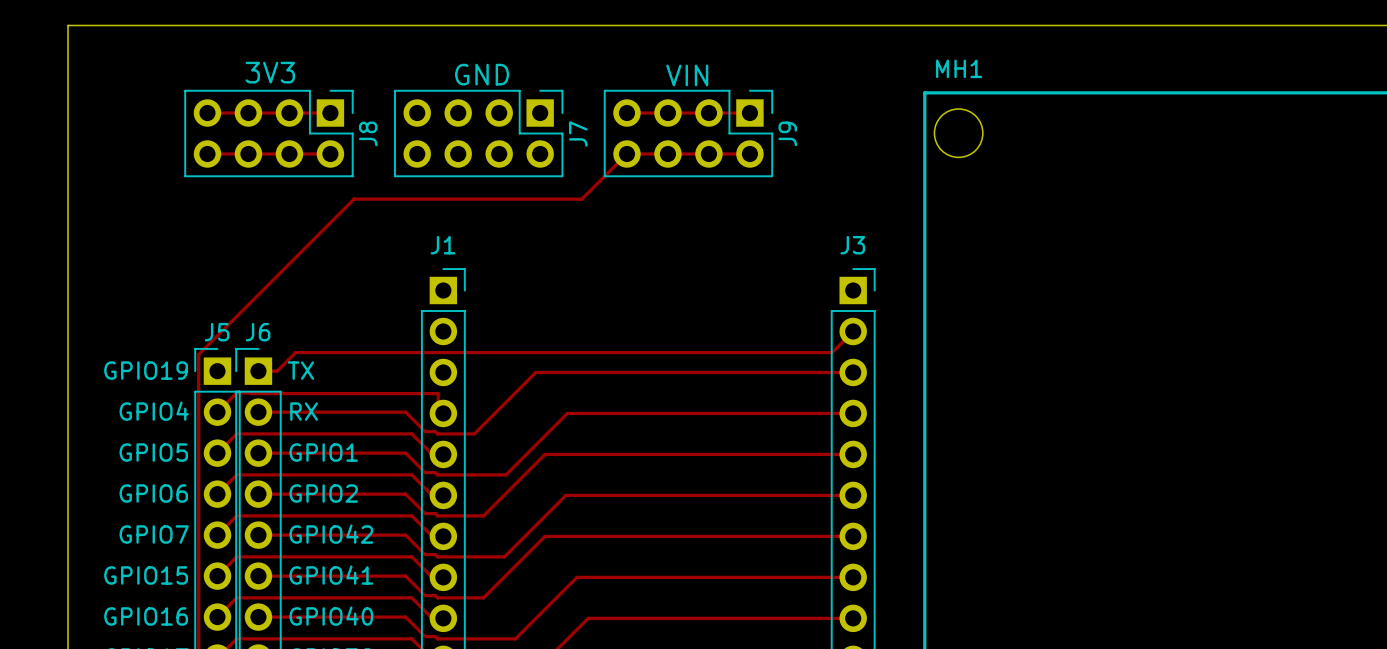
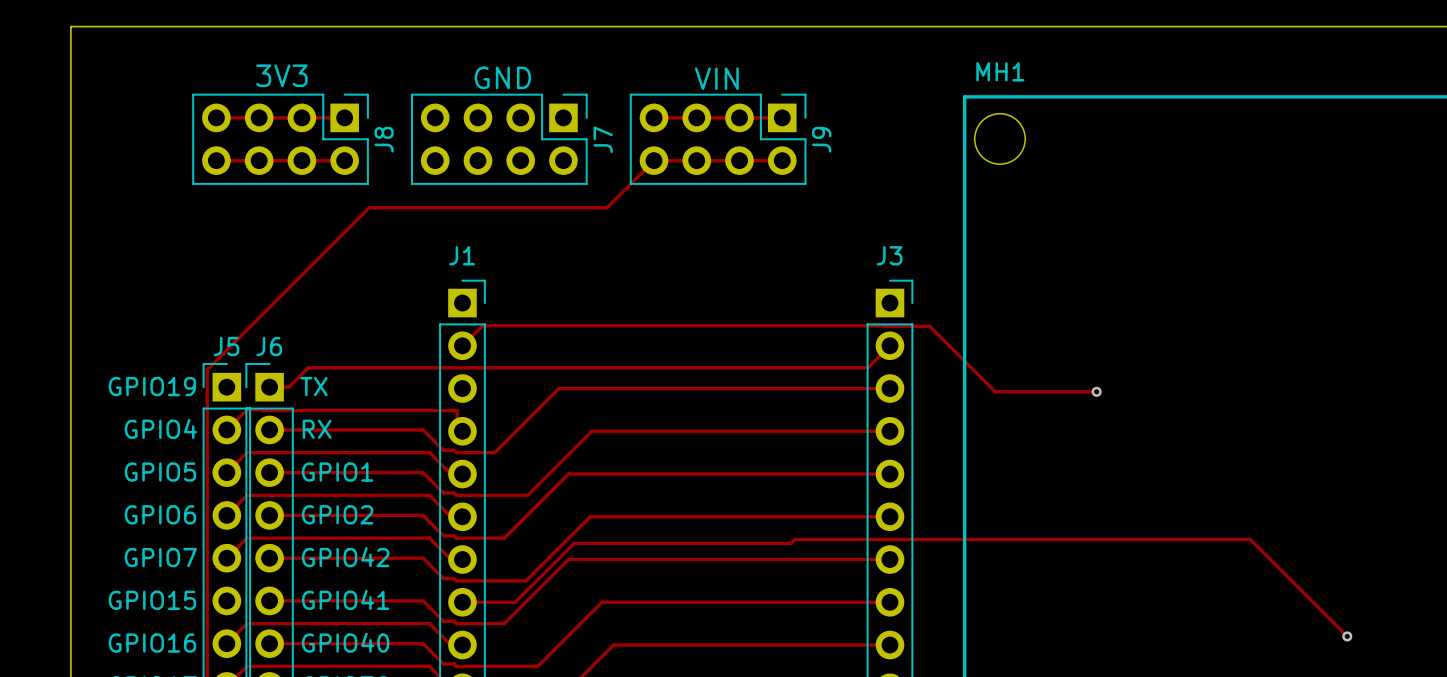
track: none -> (462, 345) (482, 325) (929, 326) (995, 391) (1096, 391)
via: none -> (1096, 391)
track: (217, 576) (236, 556) (411, 556) (432, 577) (443, 577) -> (1347, 636) (1250, 539) (794, 539) (790, 543) (573, 543) (515, 602) (462, 602)
via: none -> (1347, 636)

